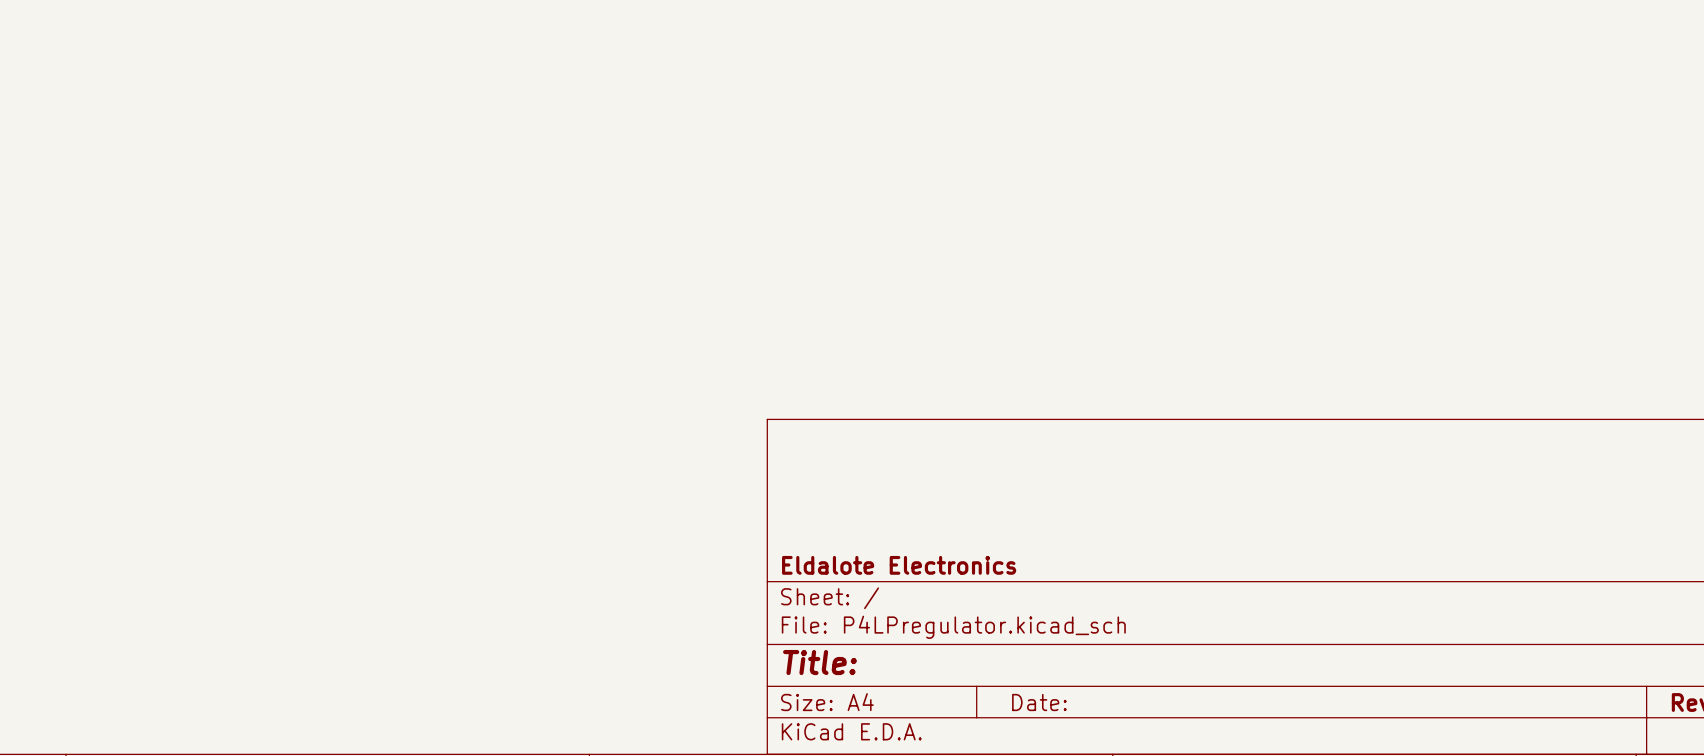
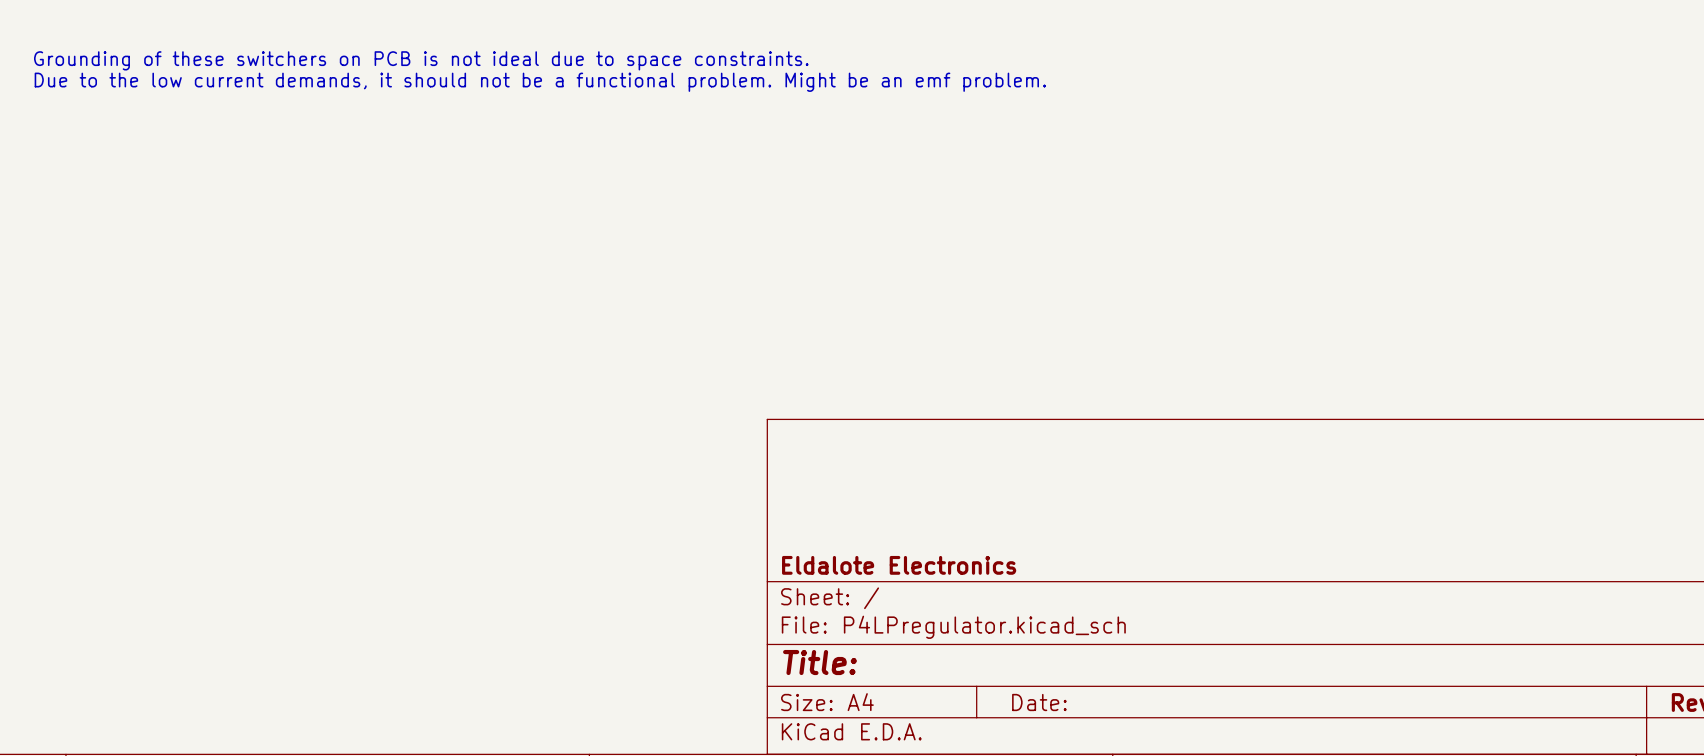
text: none -> Grounding of these switchers on PCB is not ideal due to space constraints. (421, 60)
text: none -> Due to the low current demands, it should not be a functional problem. Might be an emf problem. (540, 82)

